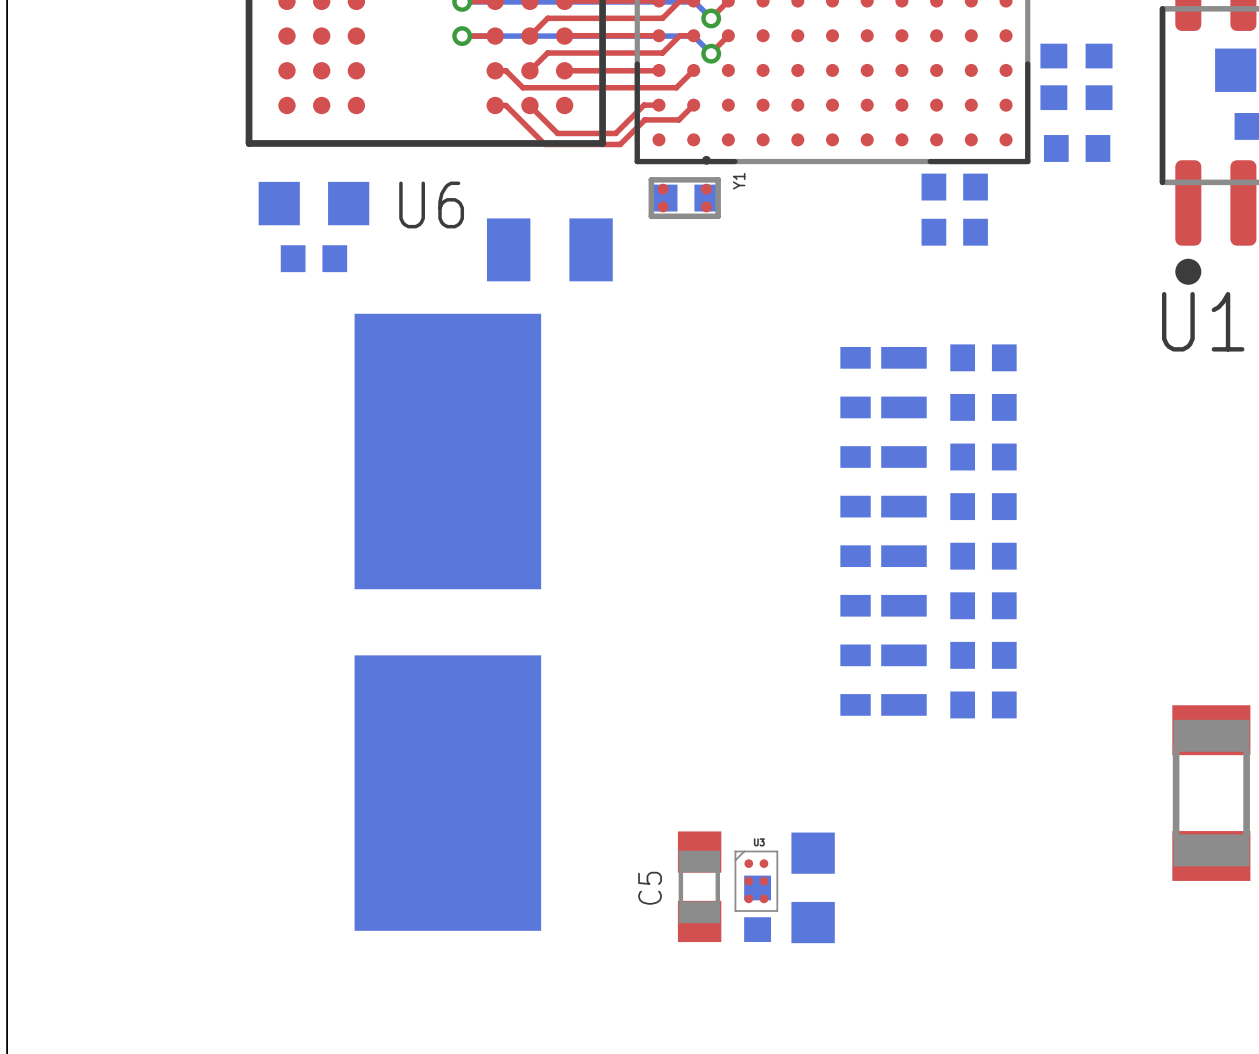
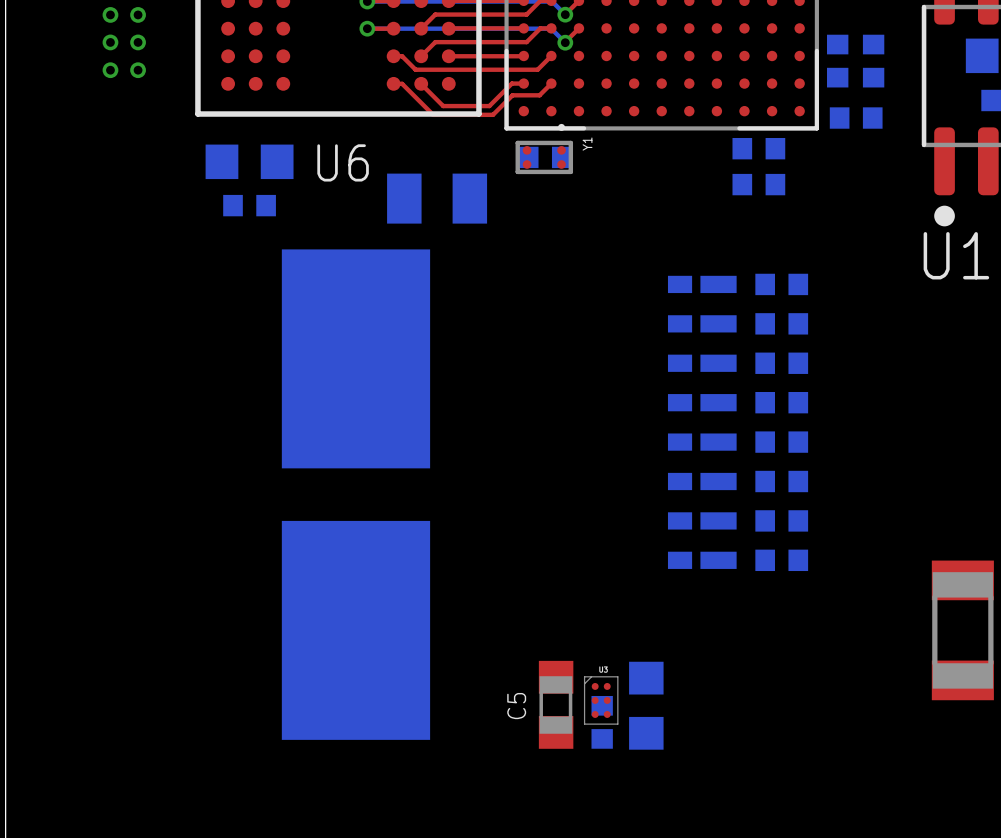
via: none -> (110, 14)
via: none -> (138, 14)
via: none -> (110, 42)
via: none -> (138, 42)
via: none -> (110, 70)
via: none -> (138, 70)

